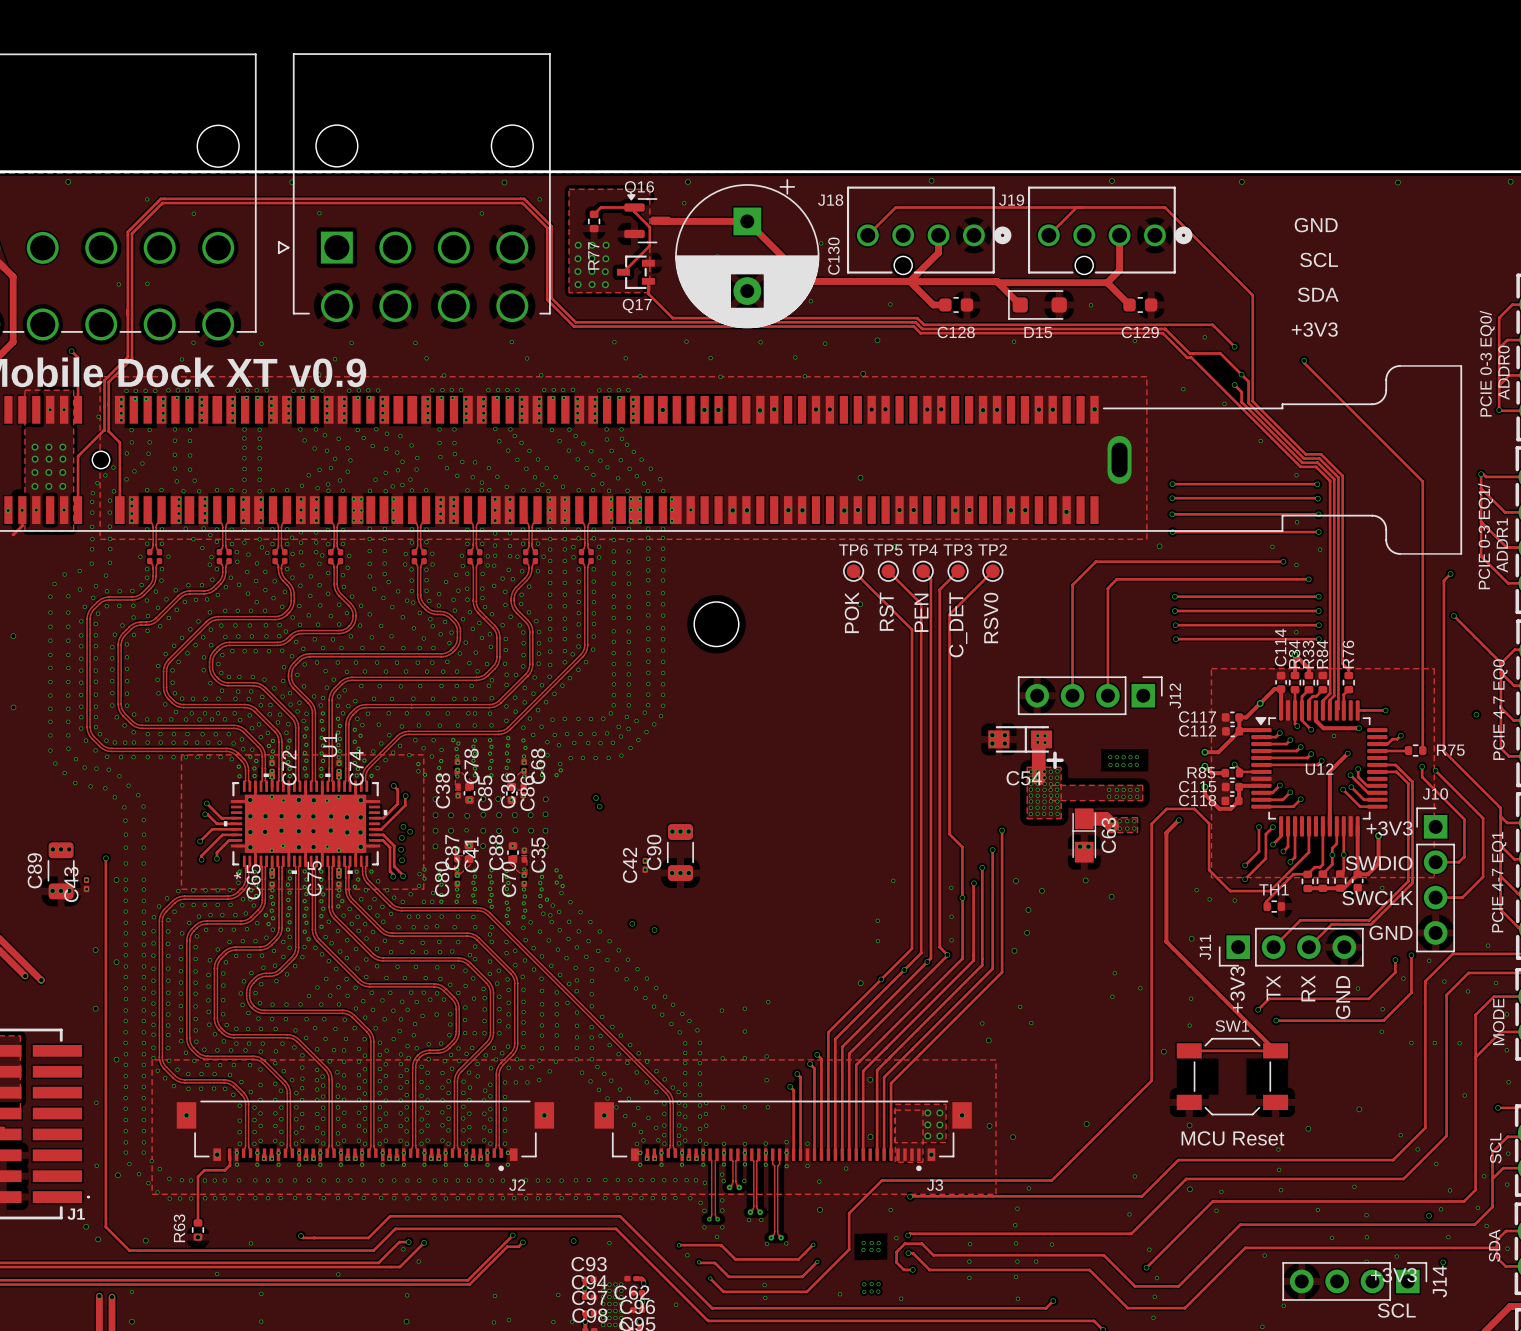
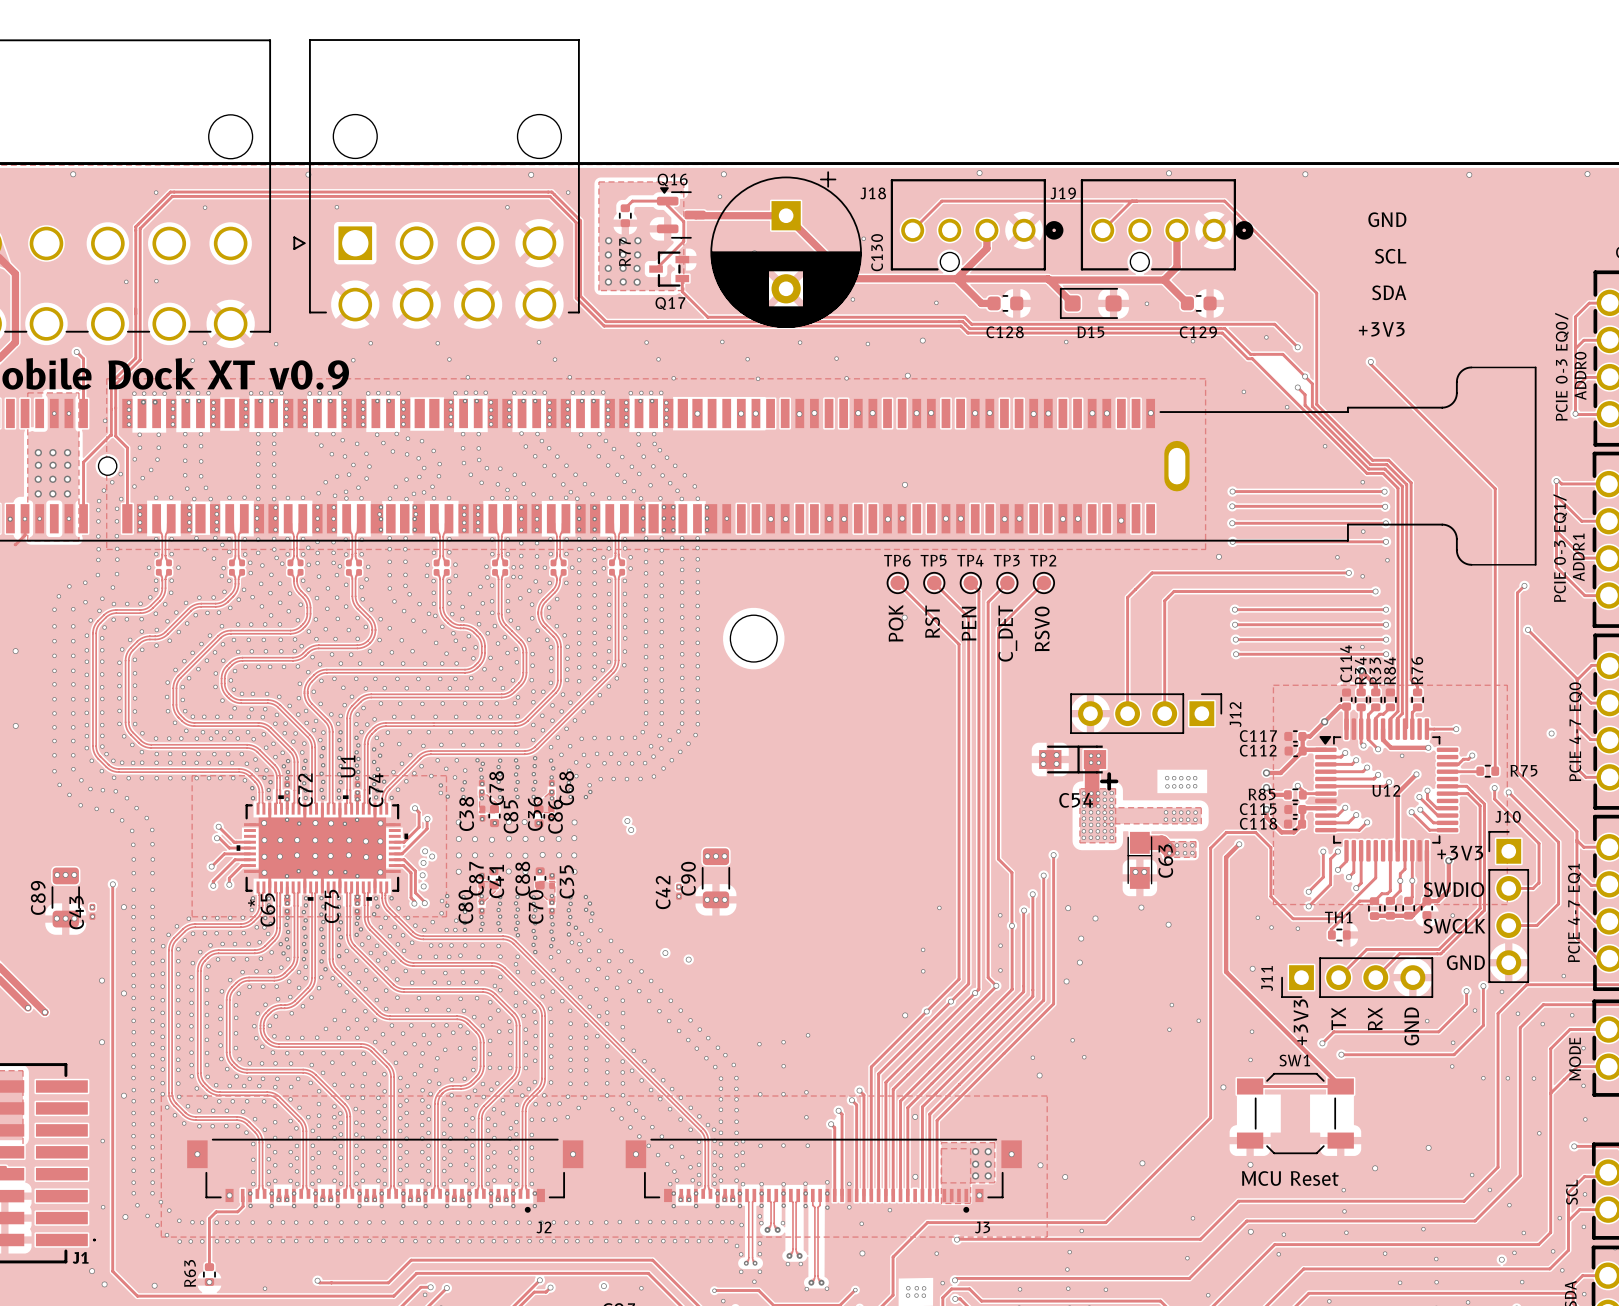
via: (353, 499) -> none
via: none -> (379, 514)
via: none -> (415, 514)
via: (353, 510) -> none
via: (353, 520) -> none

